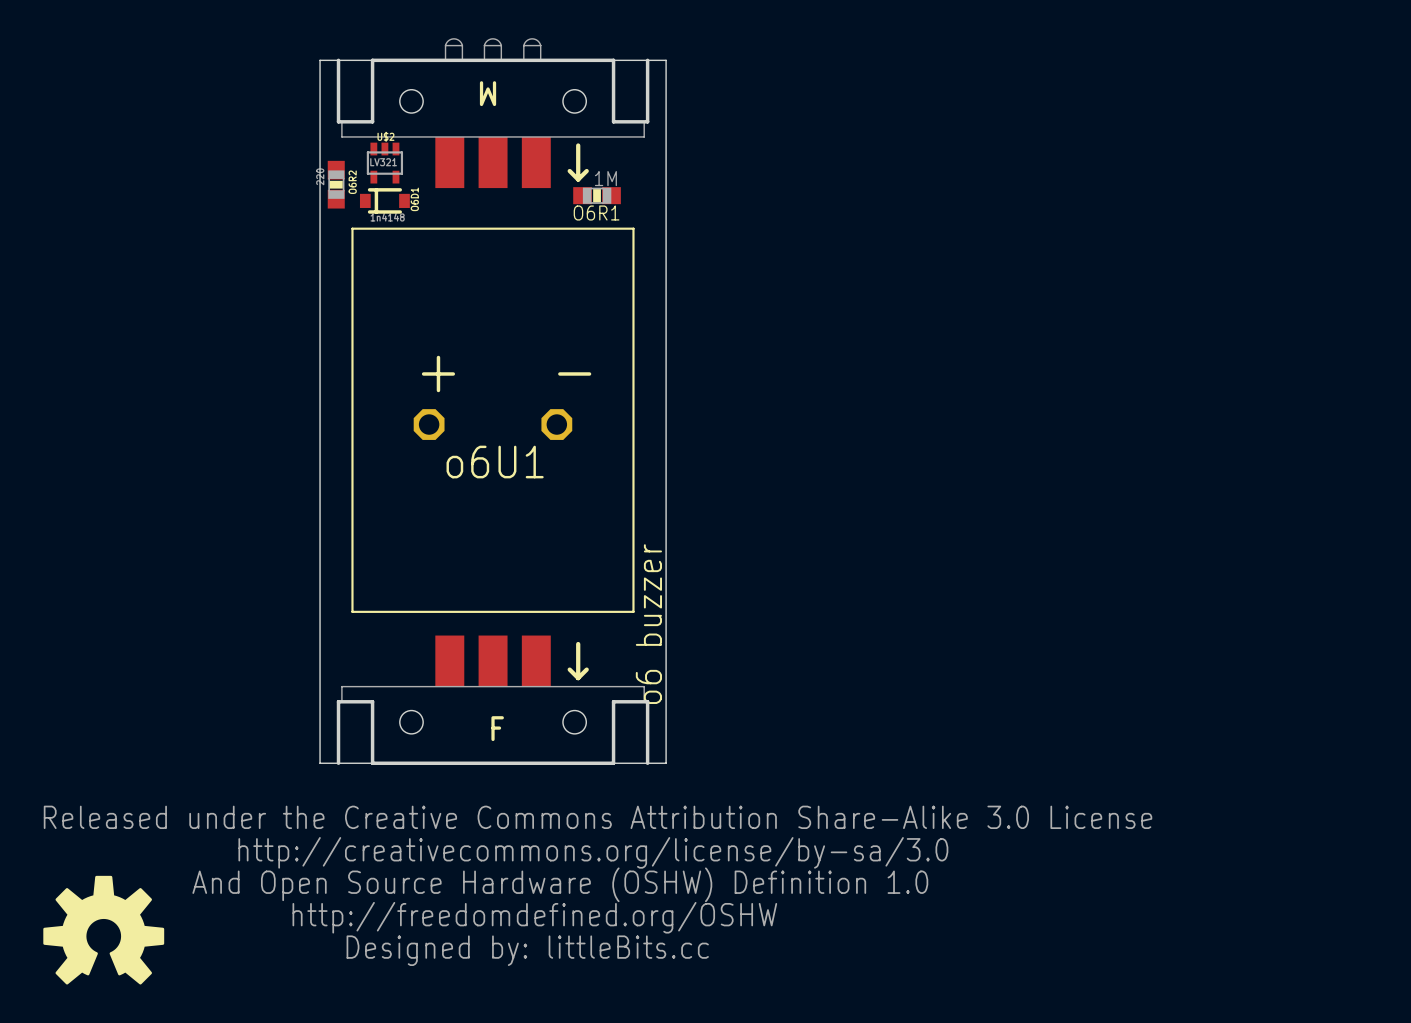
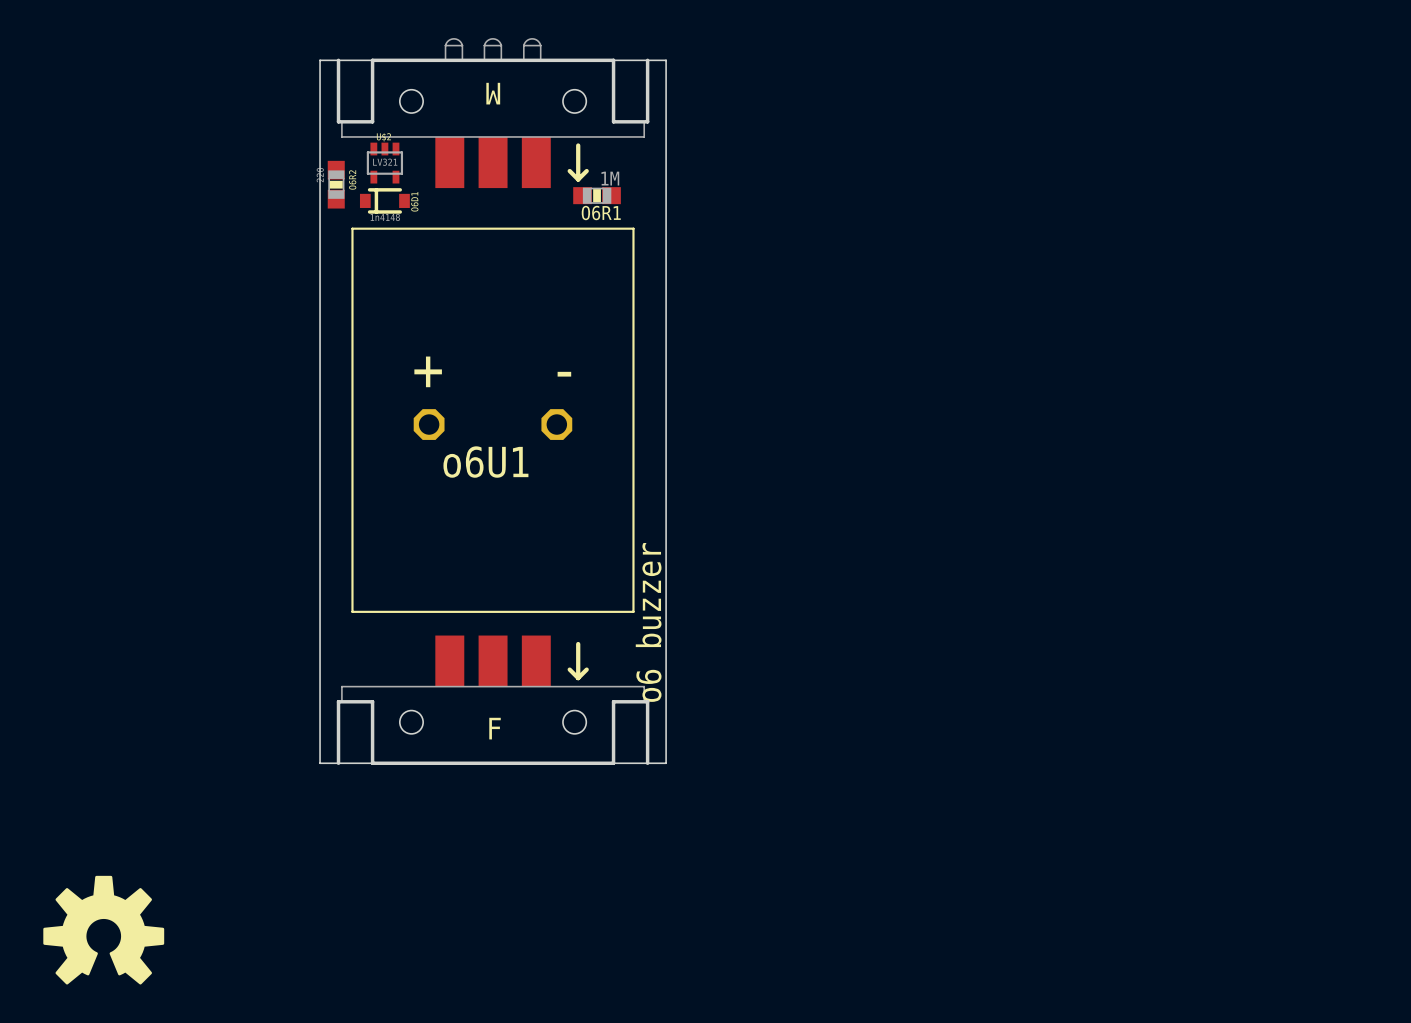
drawing: [43, 805, 1153, 966] -> none

